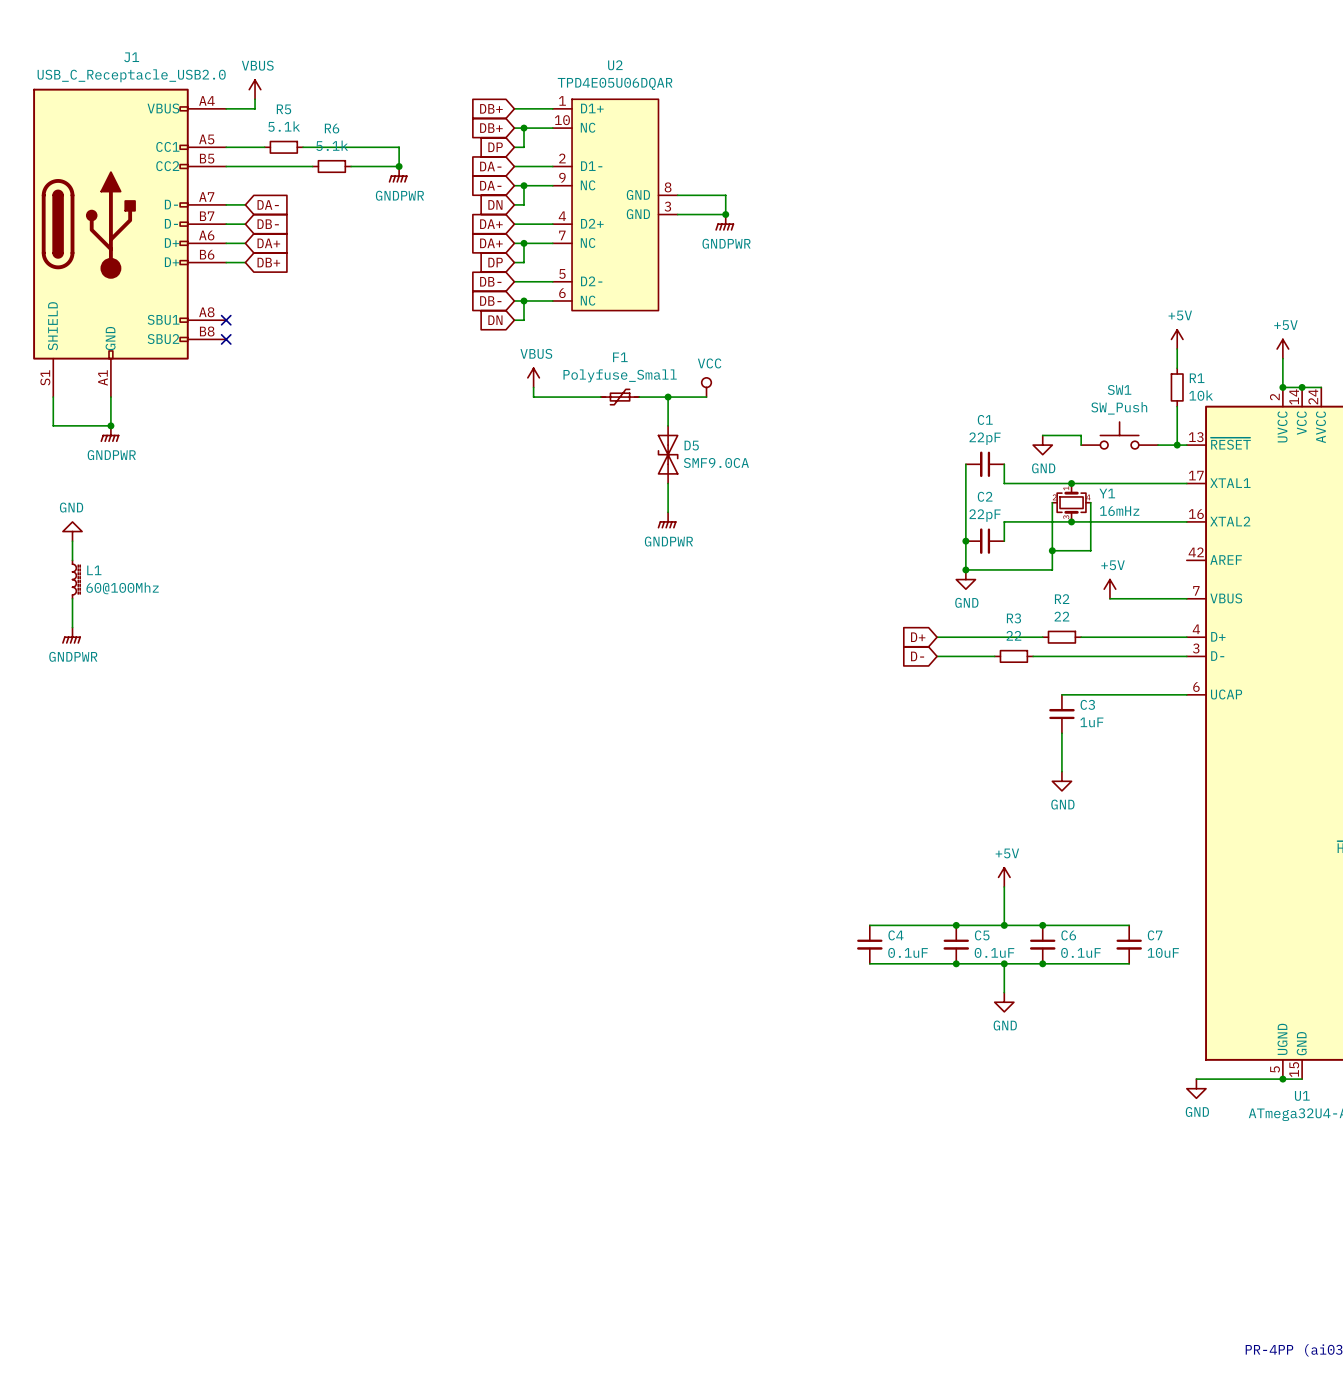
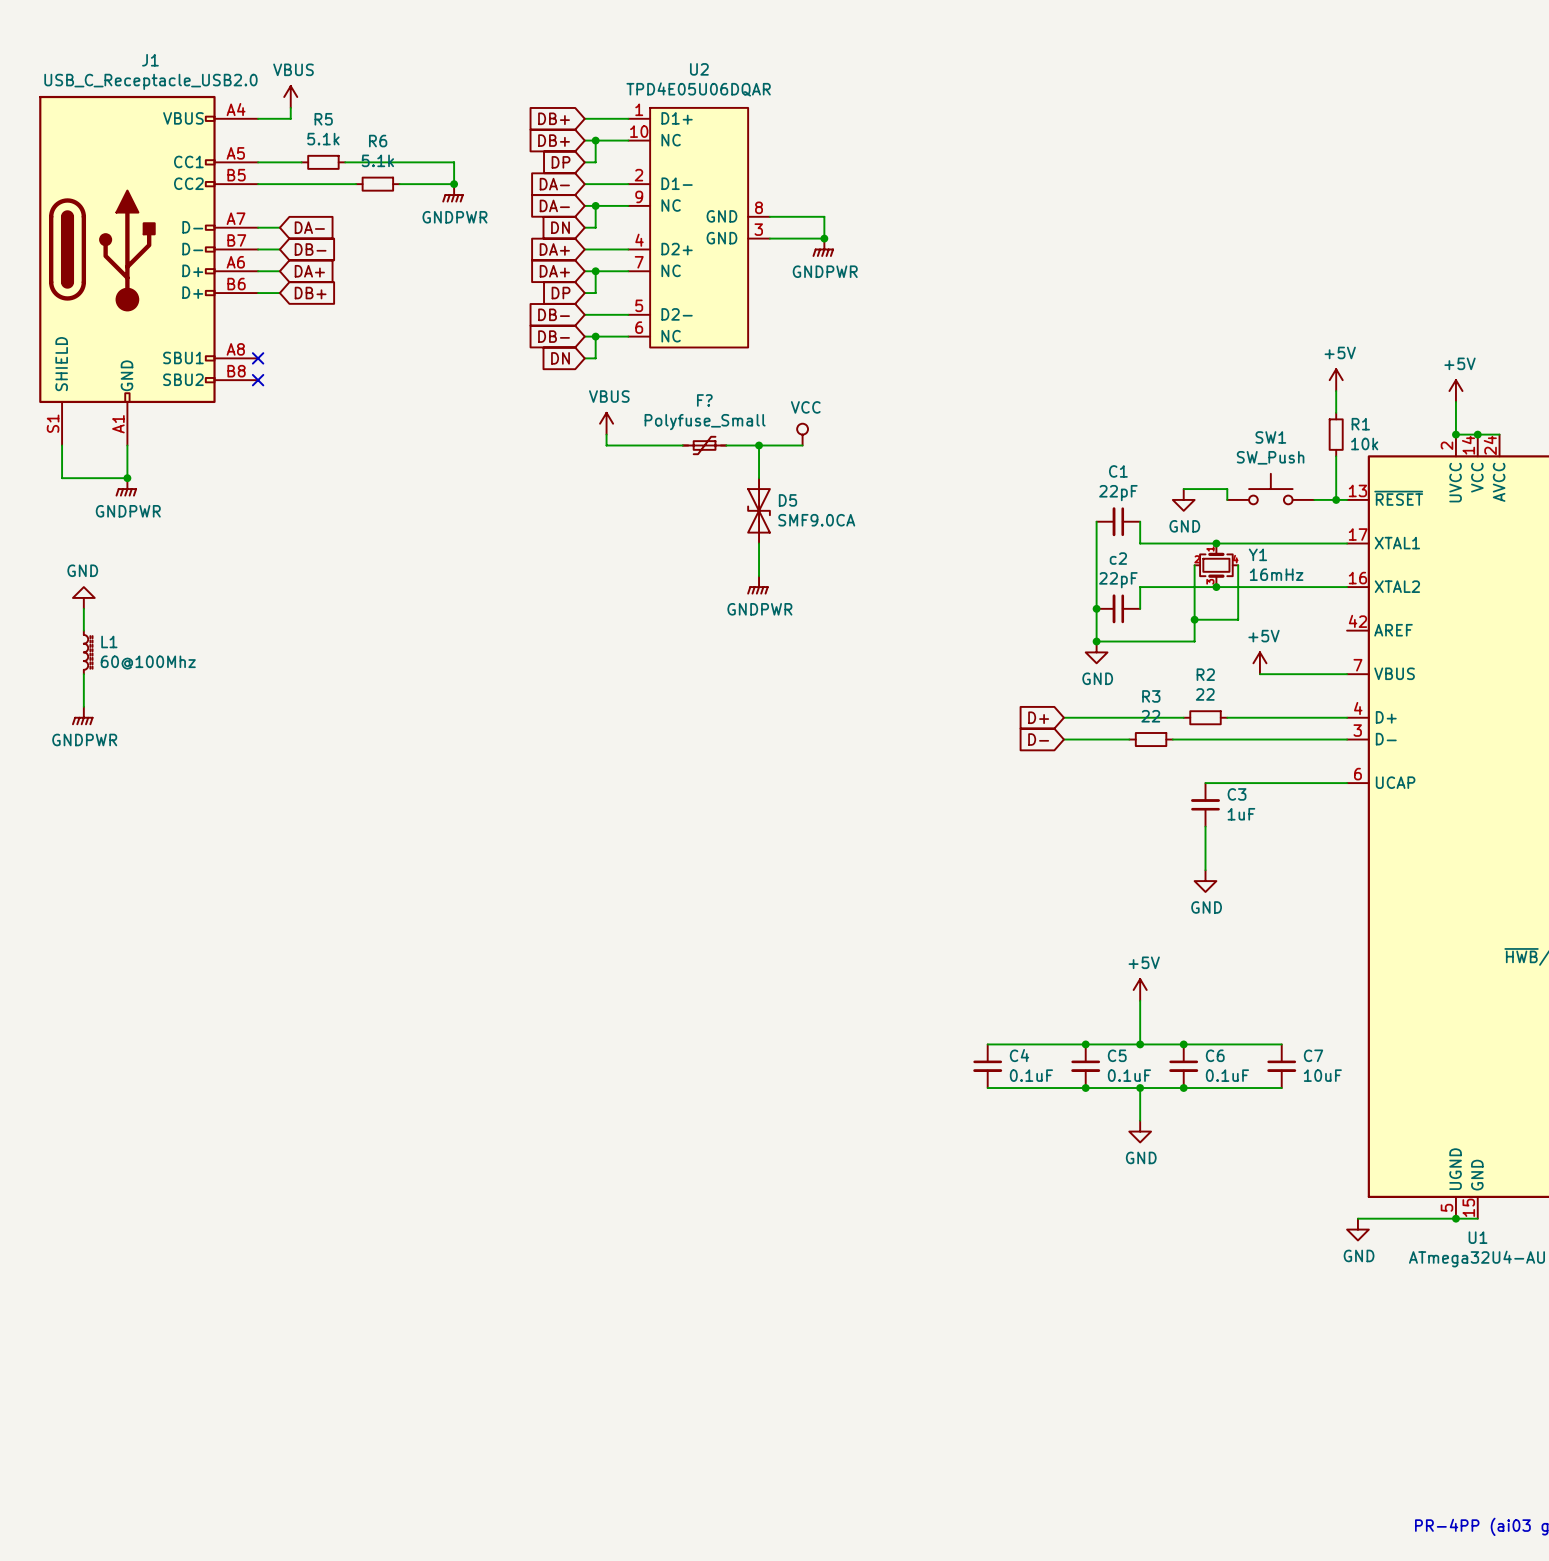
F1 name: F1 (620, 357) -> F? (704, 400)
C2 name: C2 (985, 496) -> c2 (1118, 558)

